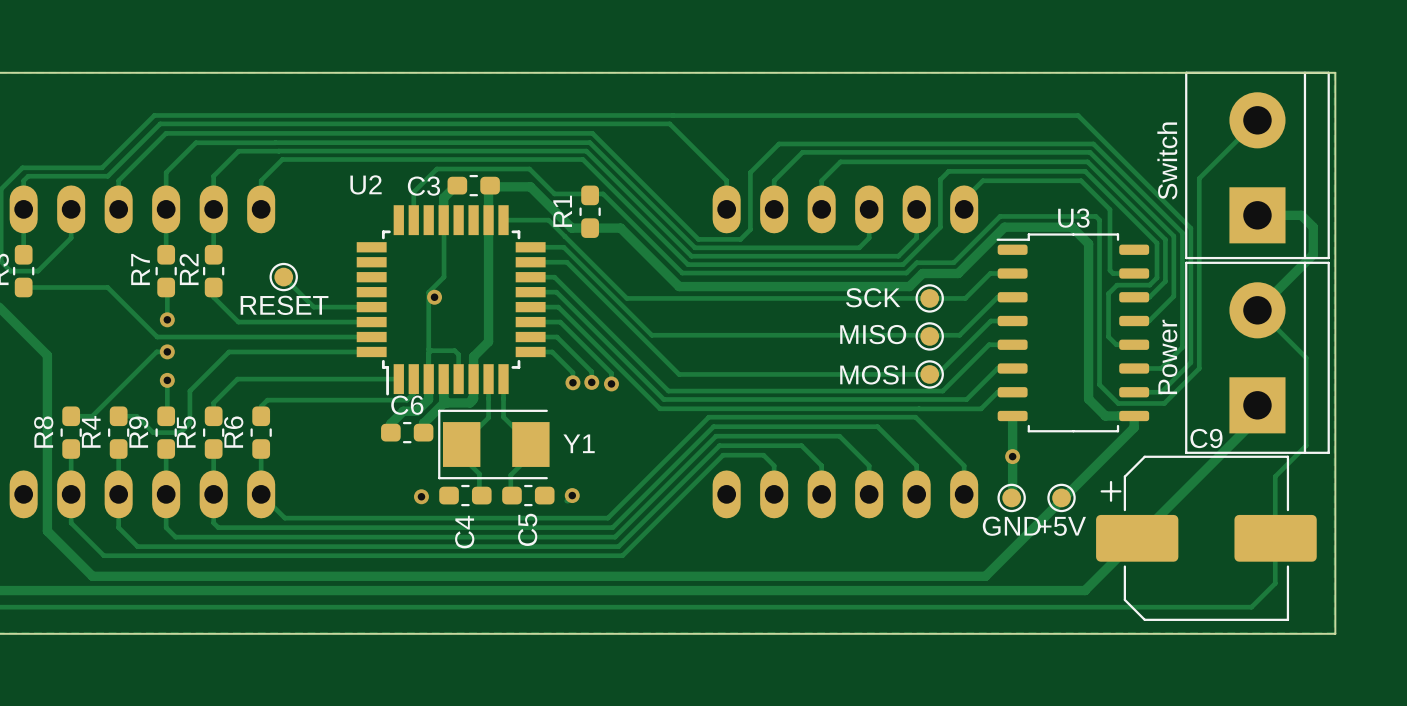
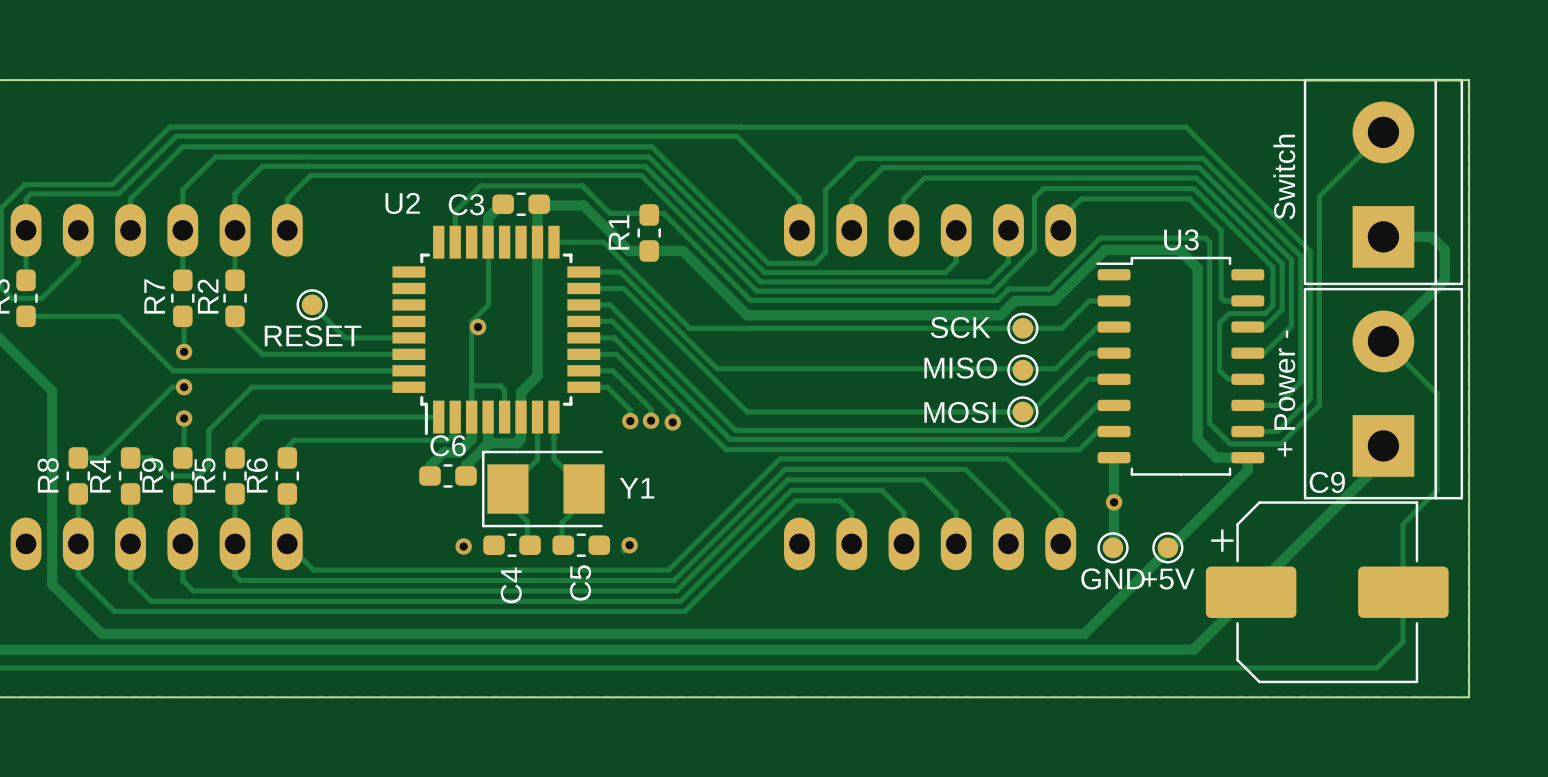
part value: Power (1167, 356) -> + Power - (1284, 393)

